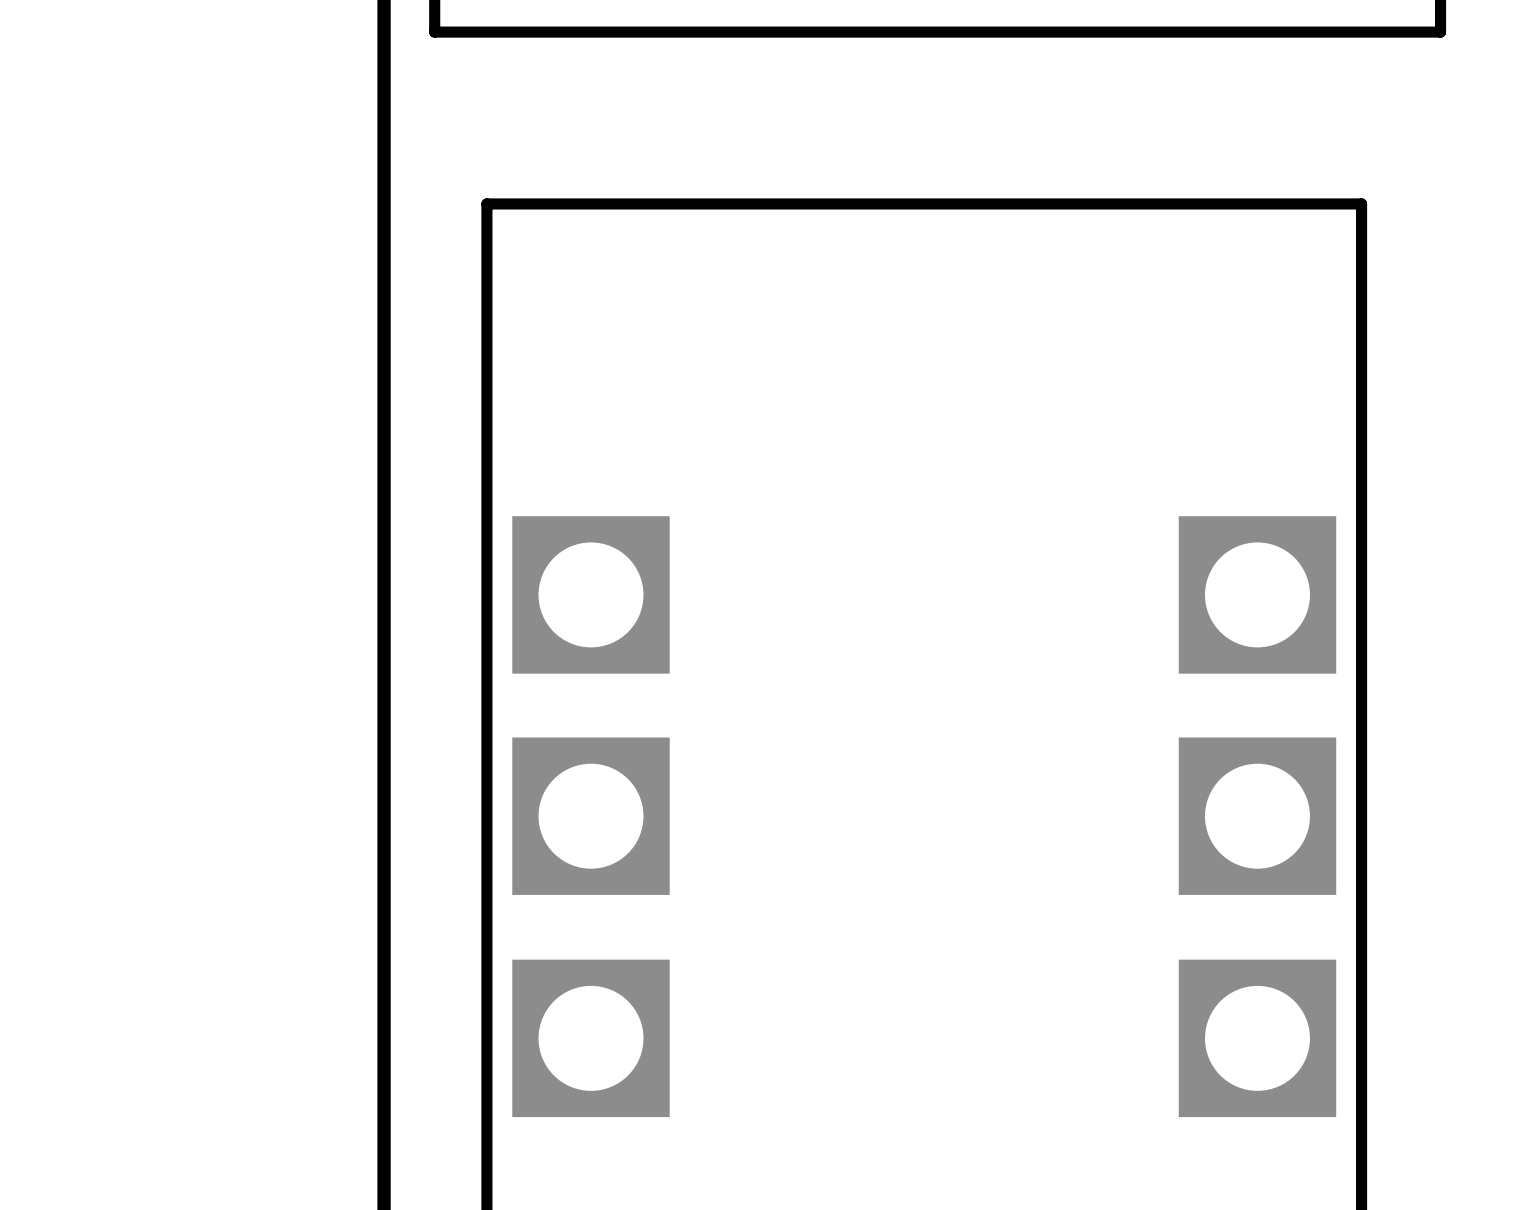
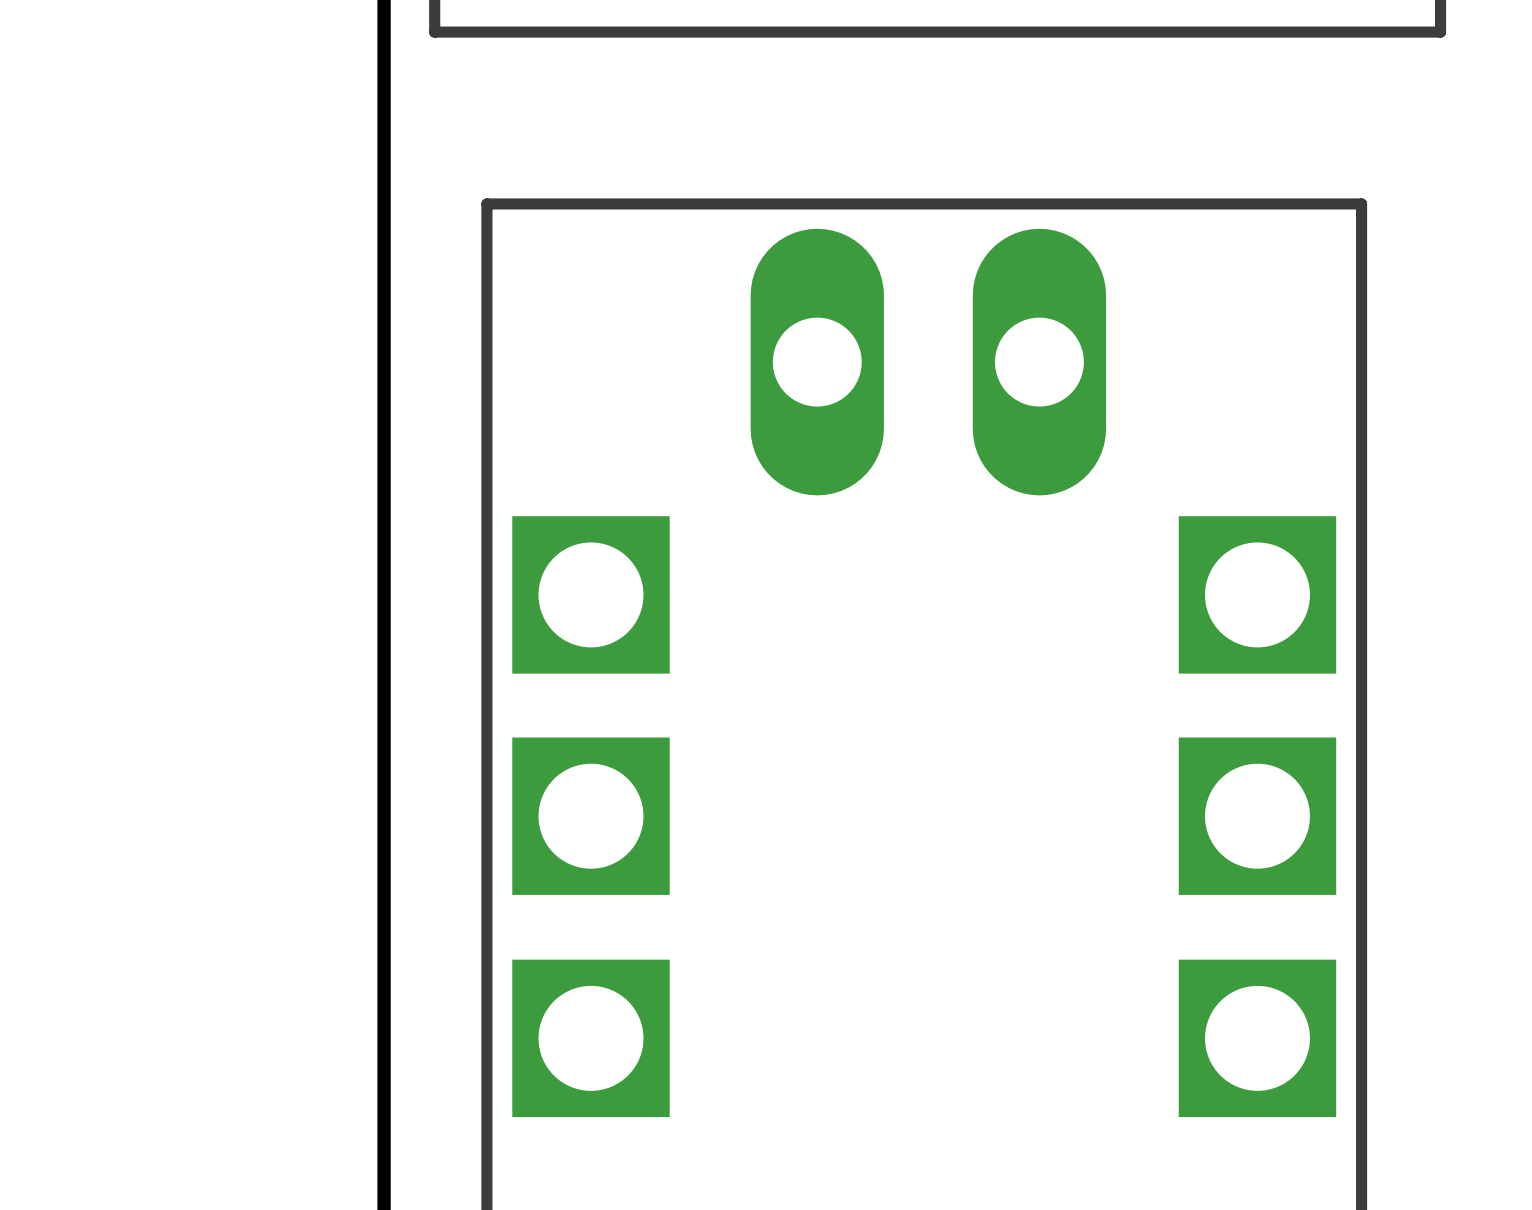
part: none -> (928, 362)

